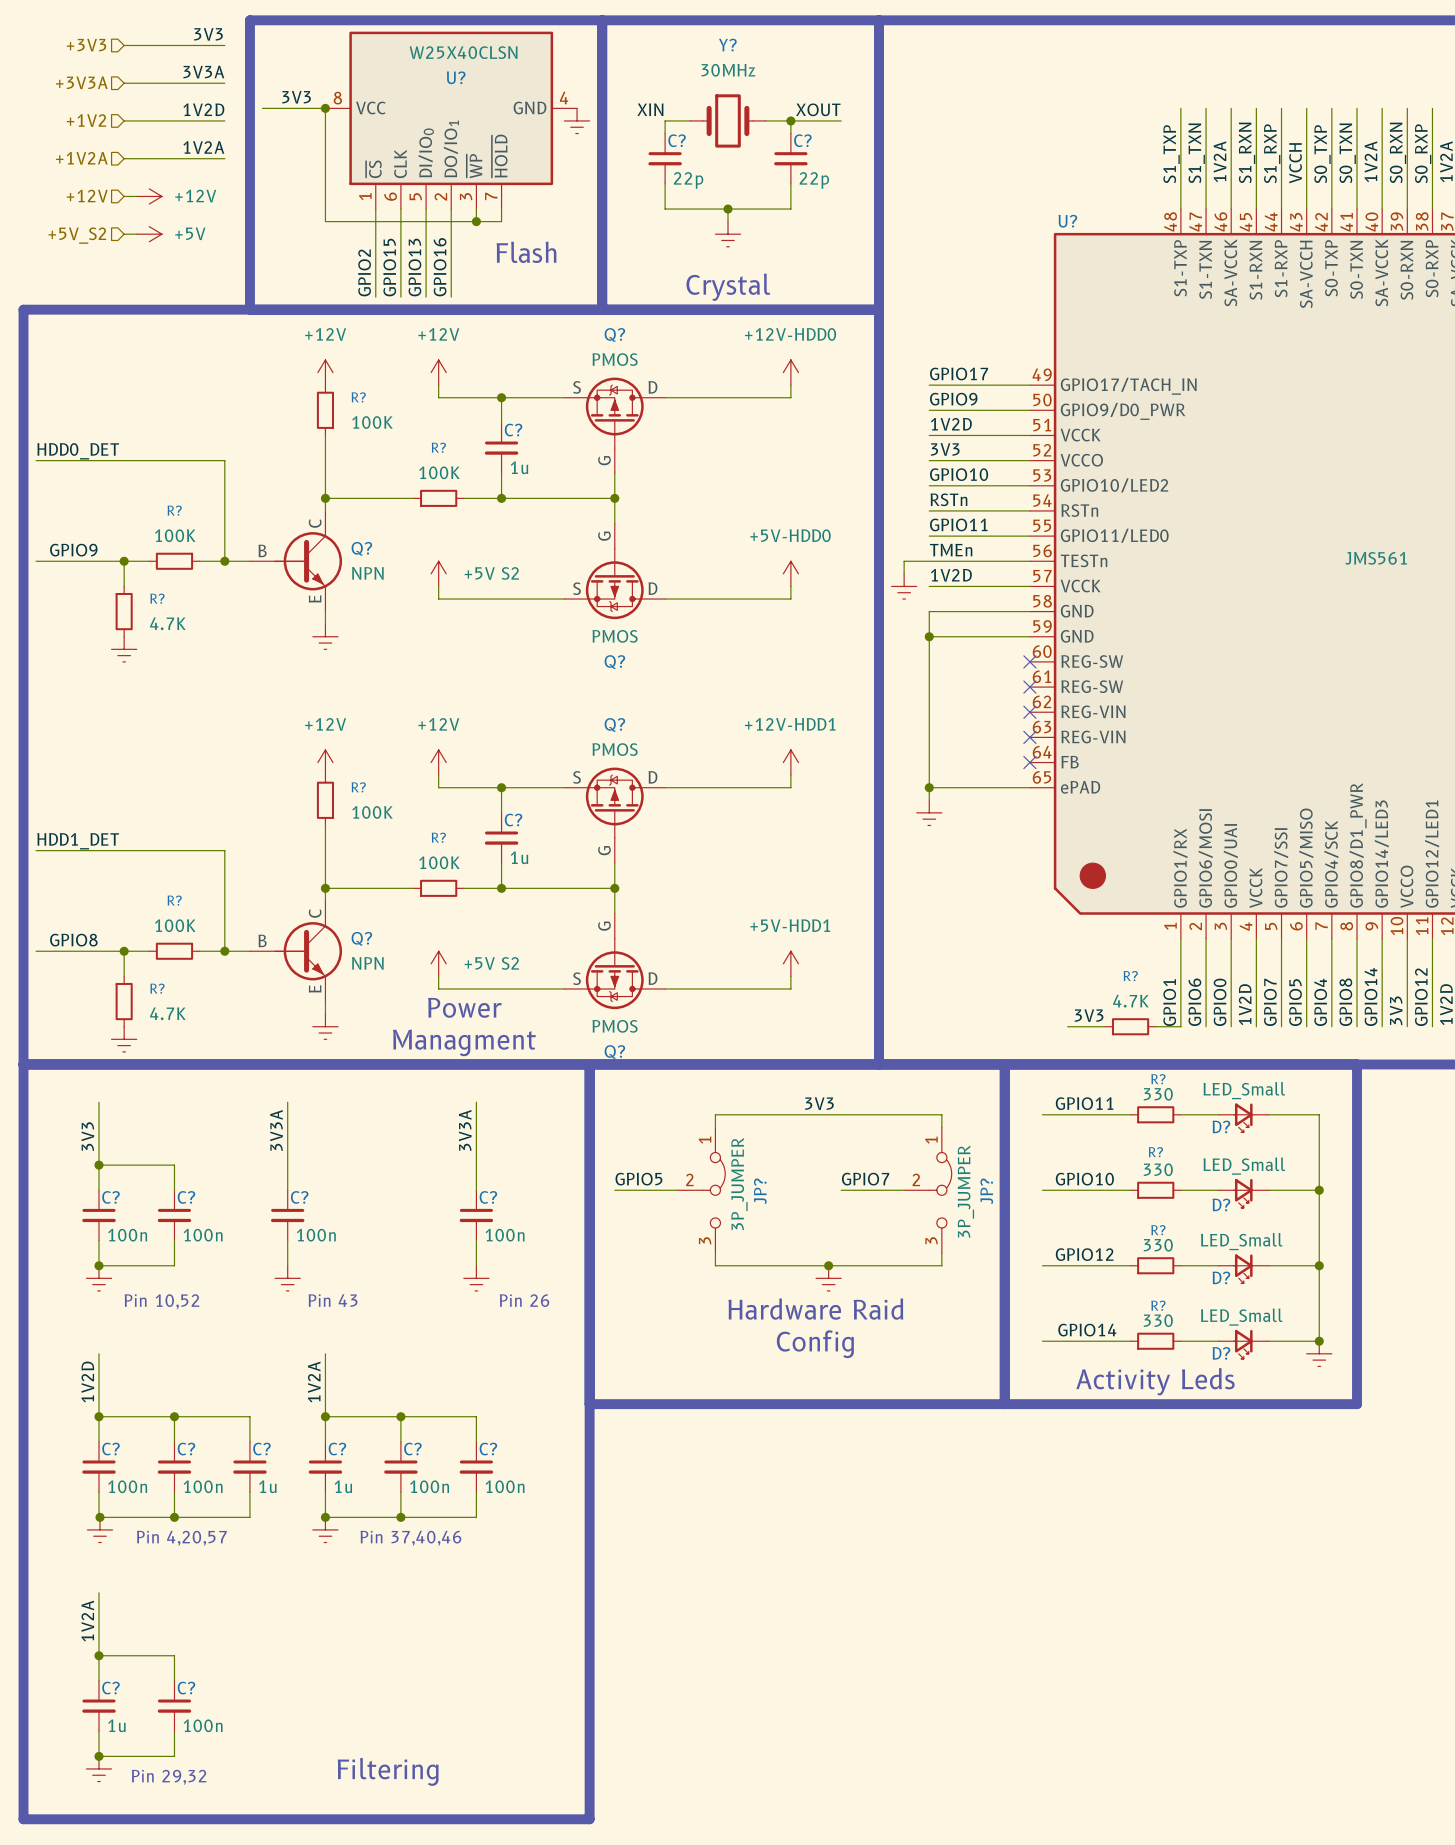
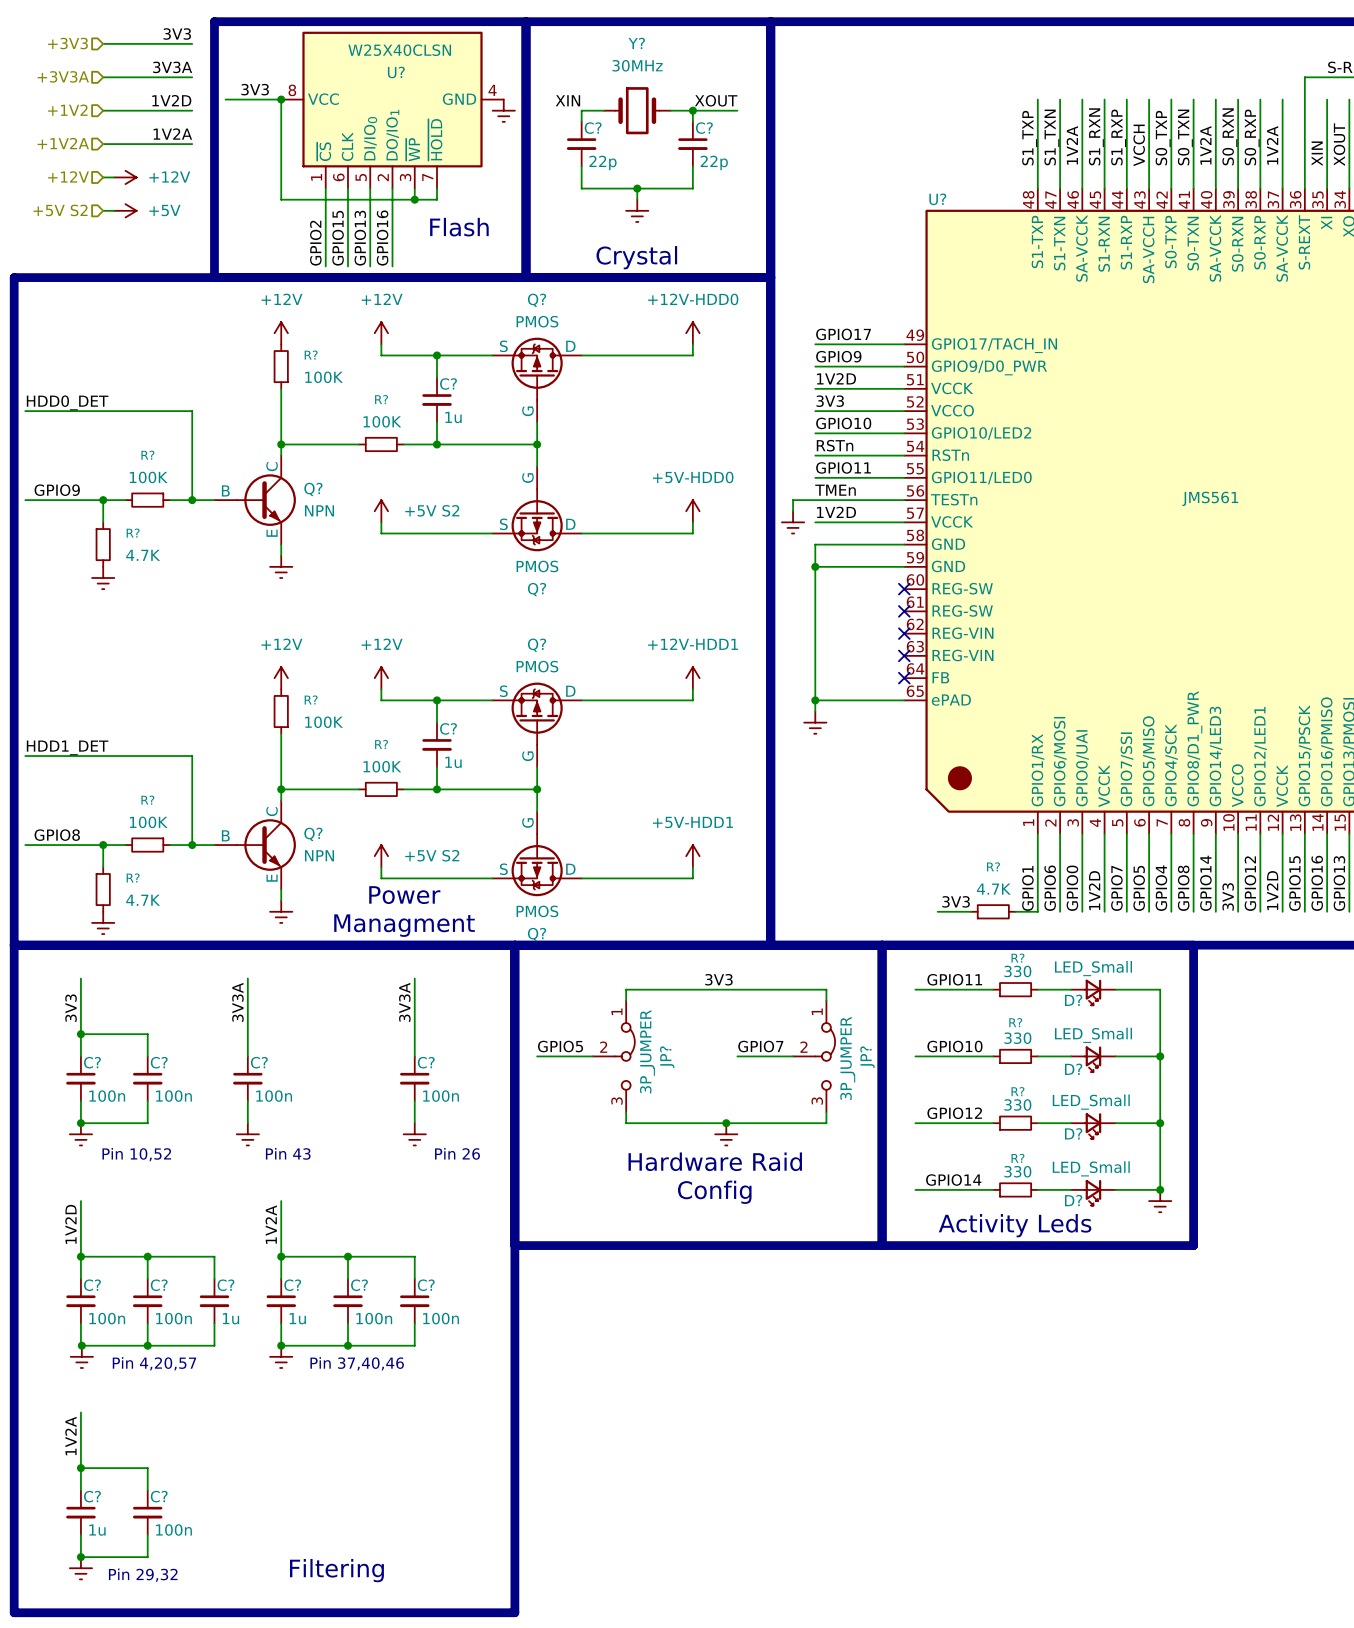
hierarchical label: +5V_S2 (77, 235) -> +5V S2 (60, 210)

